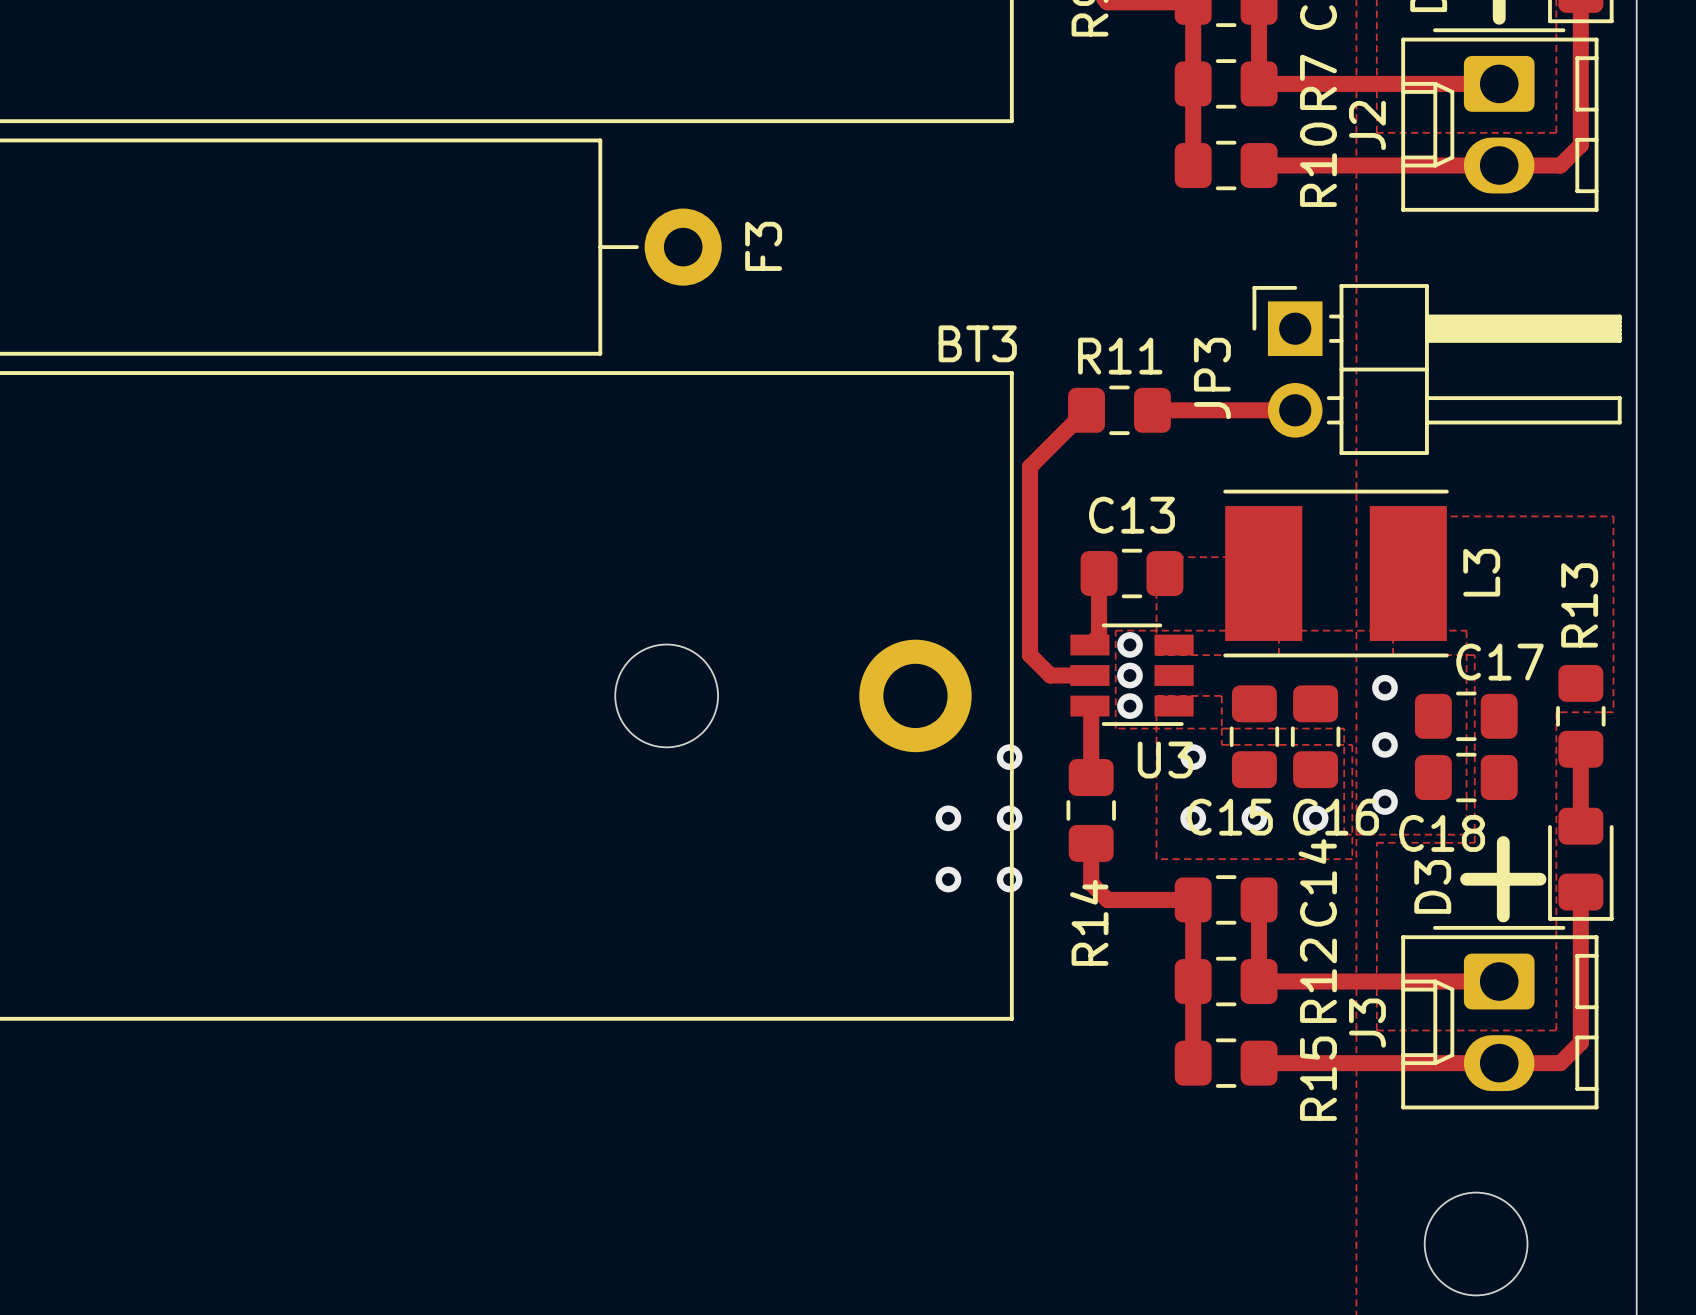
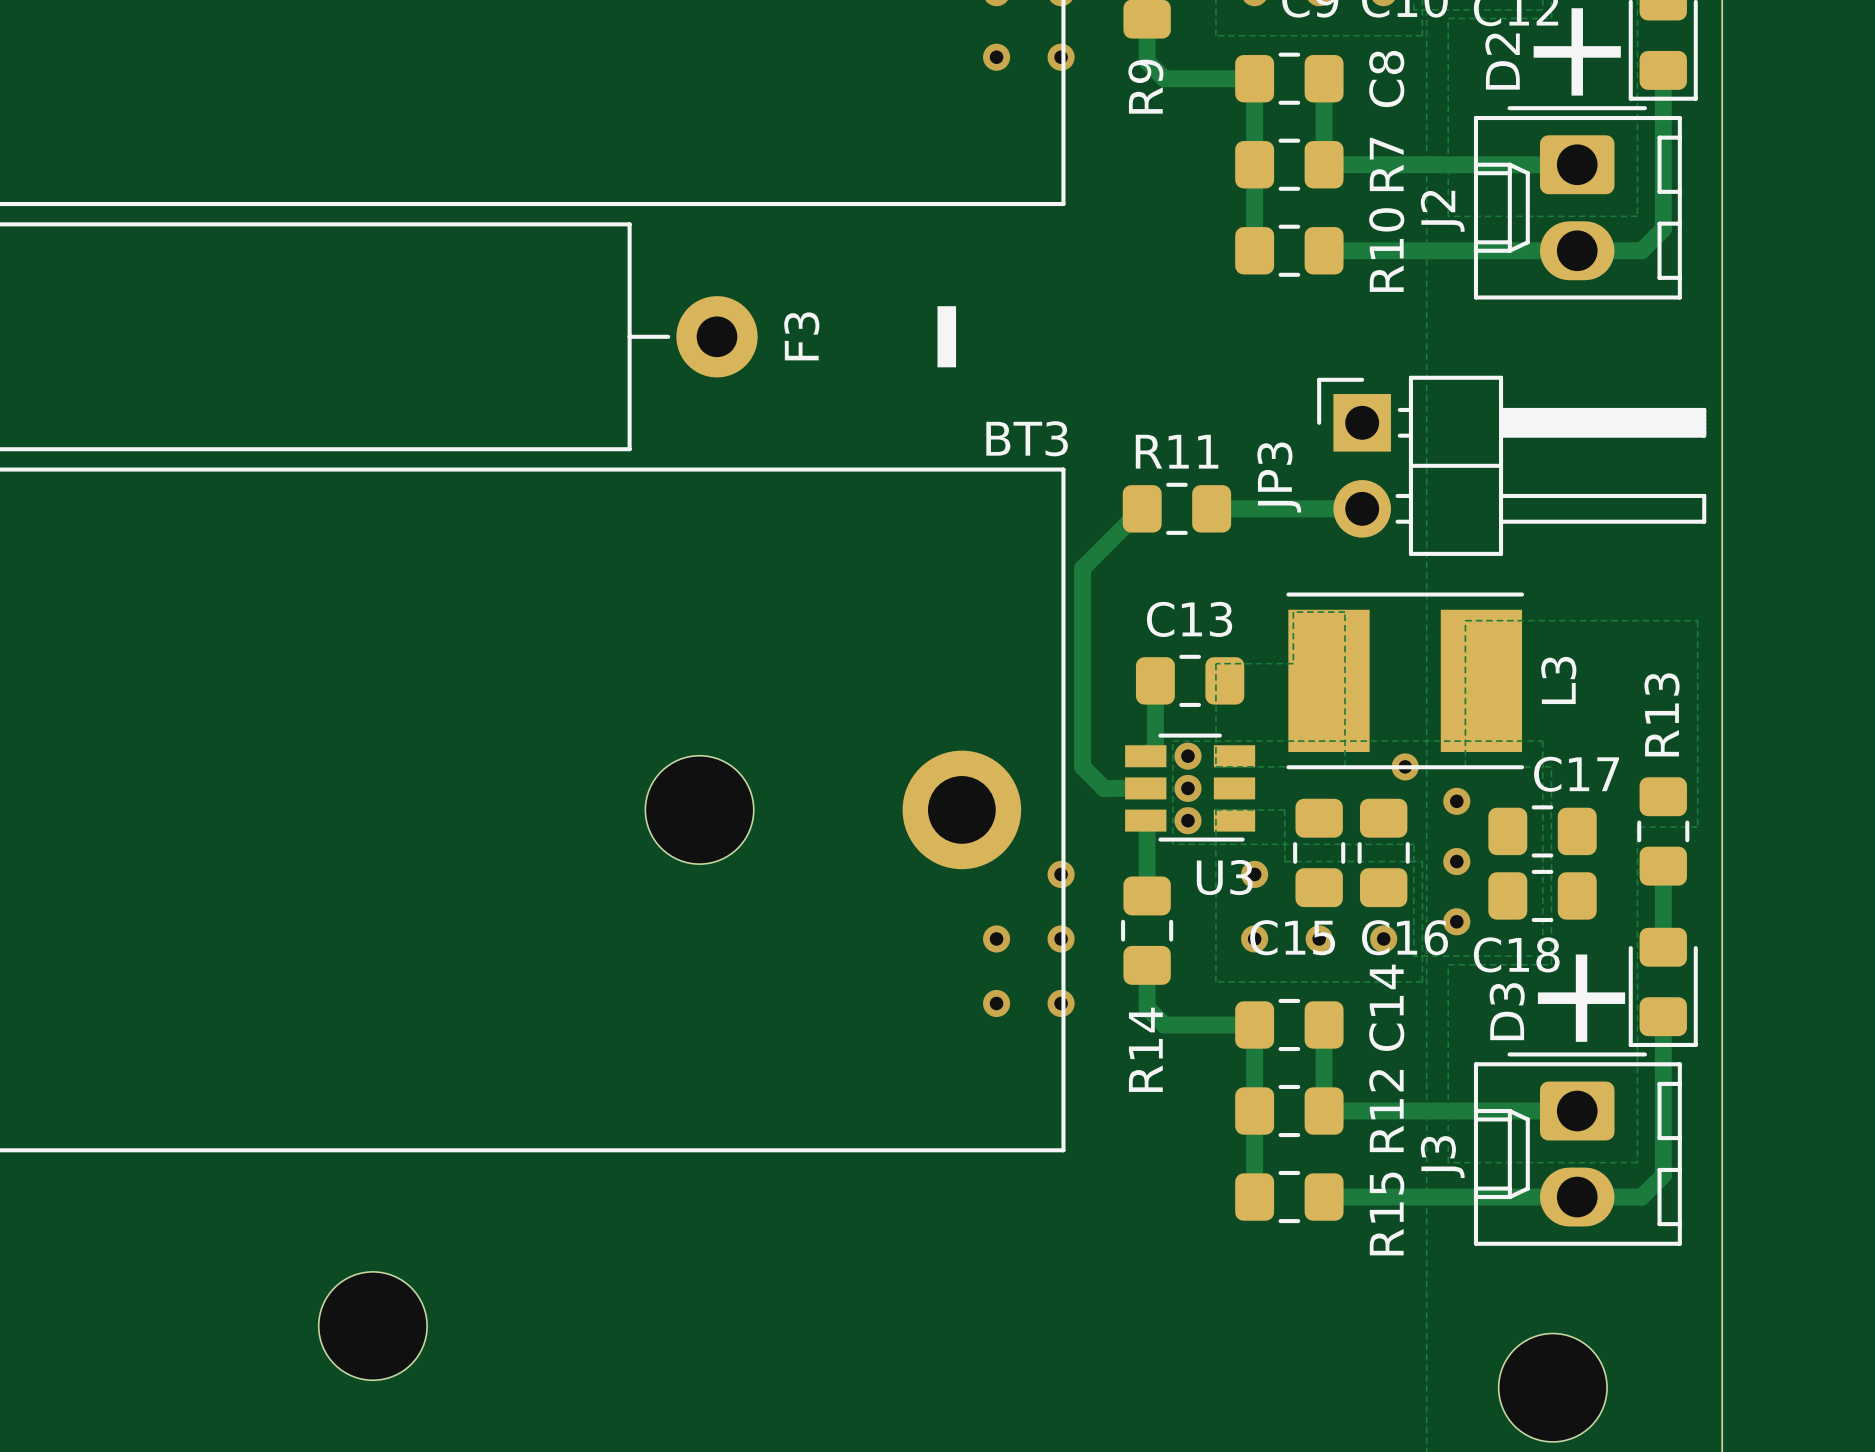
text: none -> - (946, 336)
via: none -> (1405, 766)
part: none -> (372, 1326)

